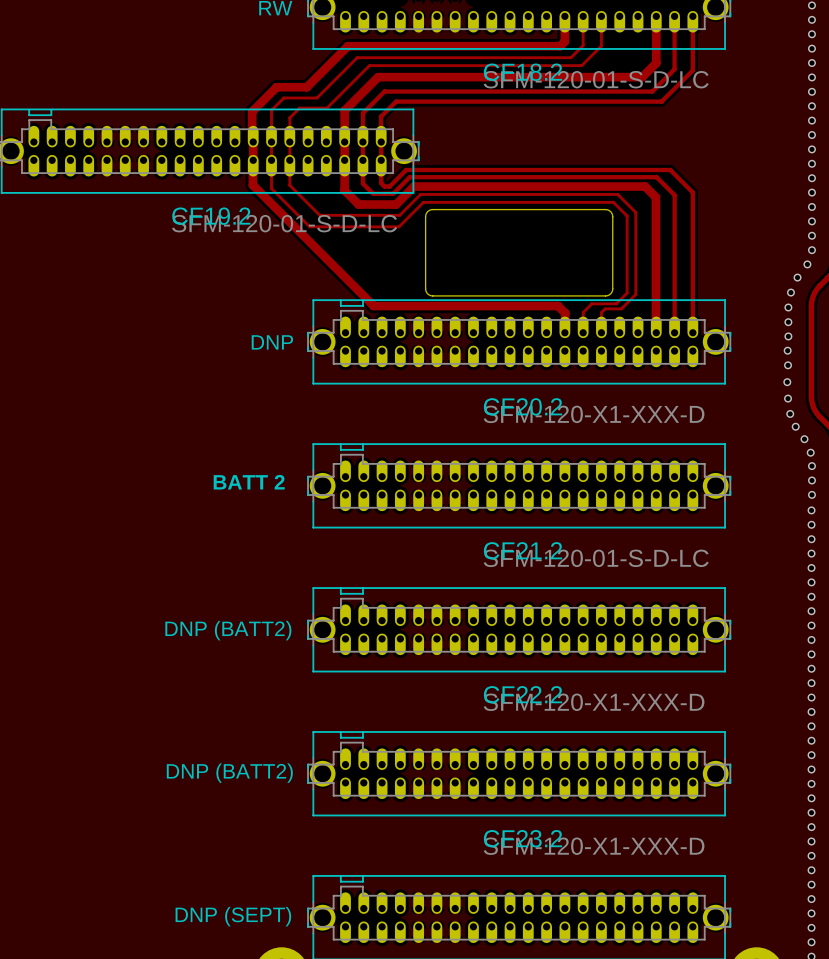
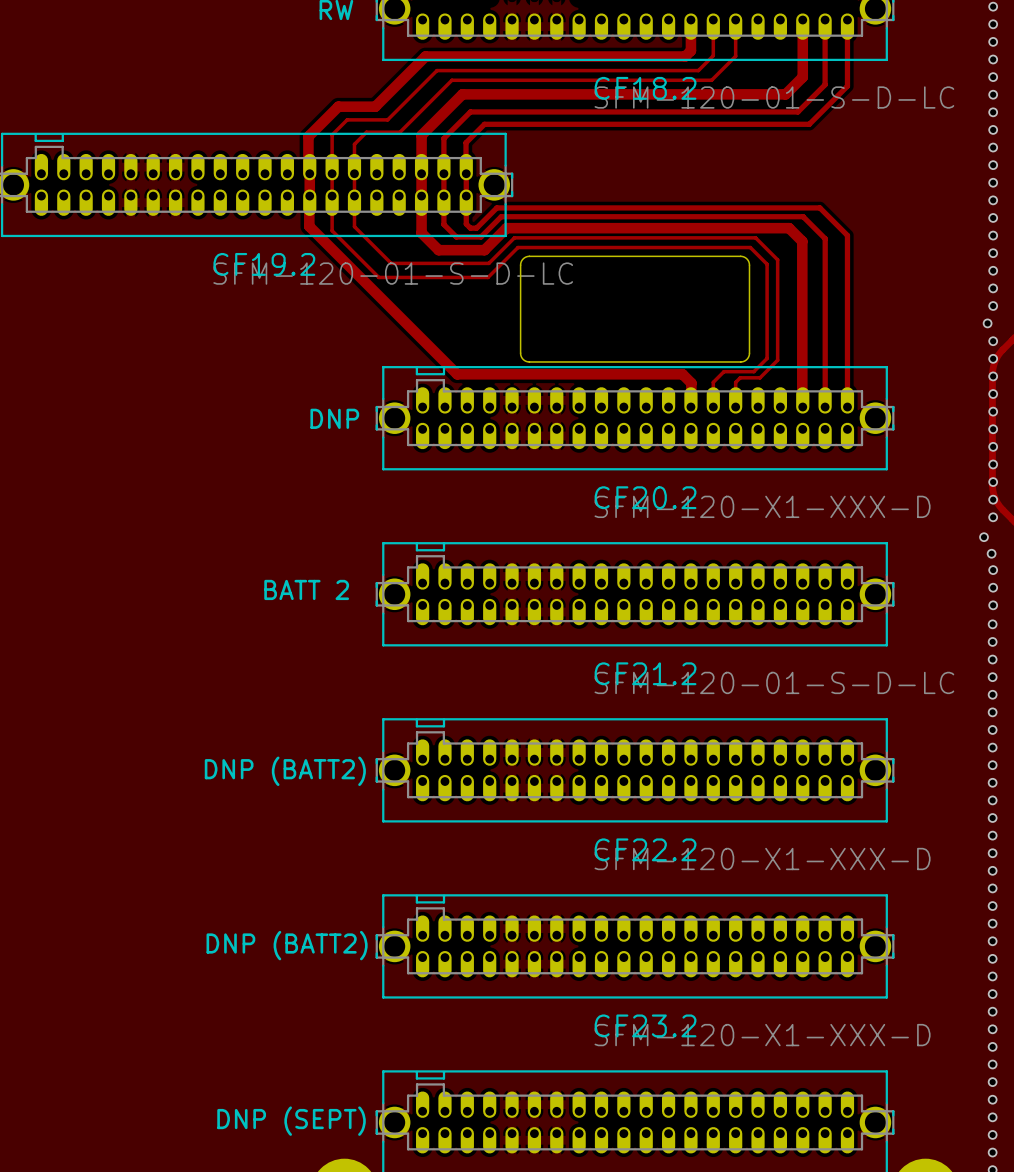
via: (797, 277) -> none
via: none -> (993, 341)
via: (790, 292) -> none
via: none -> (993, 358)
via: (788, 307) -> none
via: none -> (993, 376)
via: (788, 322) -> none
via: none -> (993, 394)
via: (788, 336) -> none
via: none -> (993, 411)
via: (787, 350) -> none
via: none -> (993, 429)
via: (788, 365) -> none
via: none -> (993, 446)
via: none -> (993, 464)
via: (787, 382) -> none
via: none -> (993, 482)
via: (788, 398) -> none
via: none -> (993, 499)
via: (790, 413) -> none
via: none -> (993, 517)
via: (795, 426) -> none

